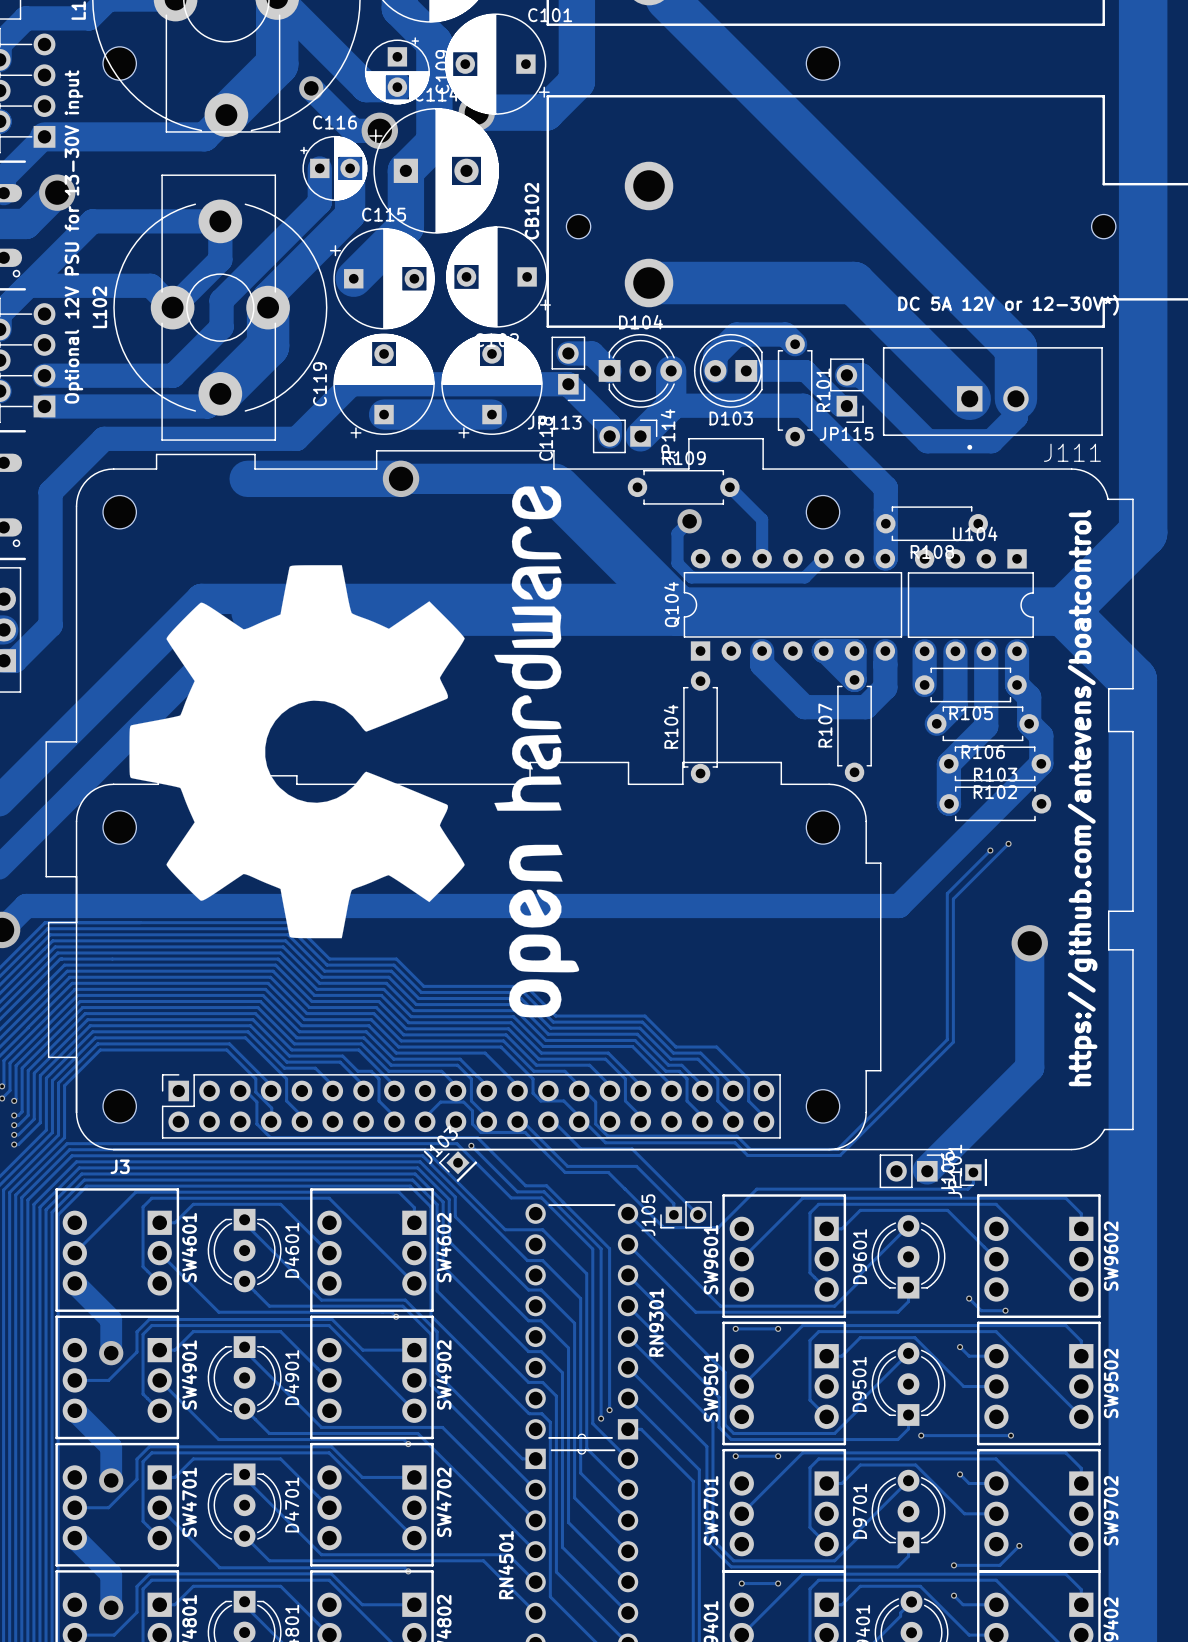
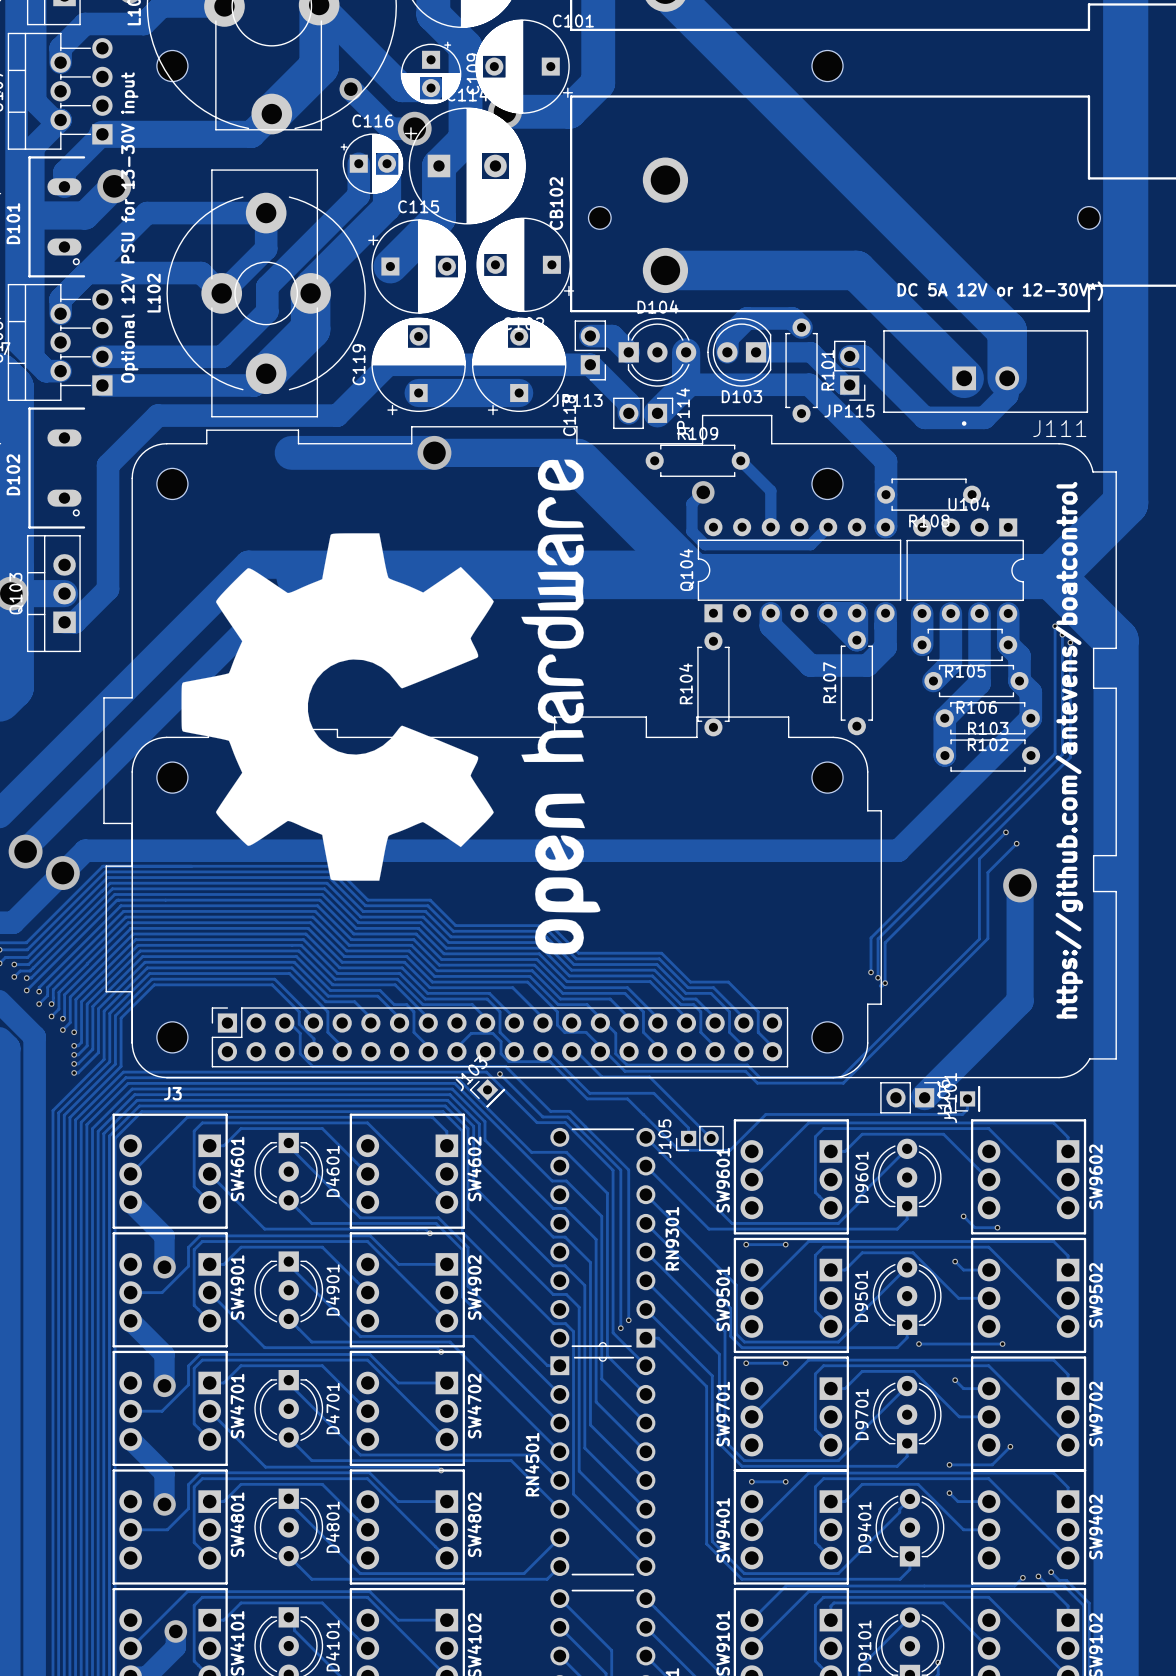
track: none -> (1055, 626) (1055, 753) (870, 937) (870, 972)
via: none -> (1055, 626)
track: none -> (1062, 634) (1062, 754) (878, 938) (878, 977)
via: none -> (1062, 634)
track: none -> (1070, 642) (1070, 757) (885, 942) (885, 981) (880, 985) (885, 983)
via: none -> (1070, 642)
track: (1008, 843) (953, 899) (953, 1042) -> (1016, 843) (987, 872) (987, 938) (948, 977)
via: (1008, 843) -> none
track: (990, 850) (947, 893) (947, 1039) -> (1005, 832) (979, 858) (979, 939) (943, 975)
via: (990, 850) -> none
via: none -> (1005, 832)
via: none -> (1016, 843)
via: none -> (870, 972)
via: none -> (878, 977)
via: none -> (885, 983)

